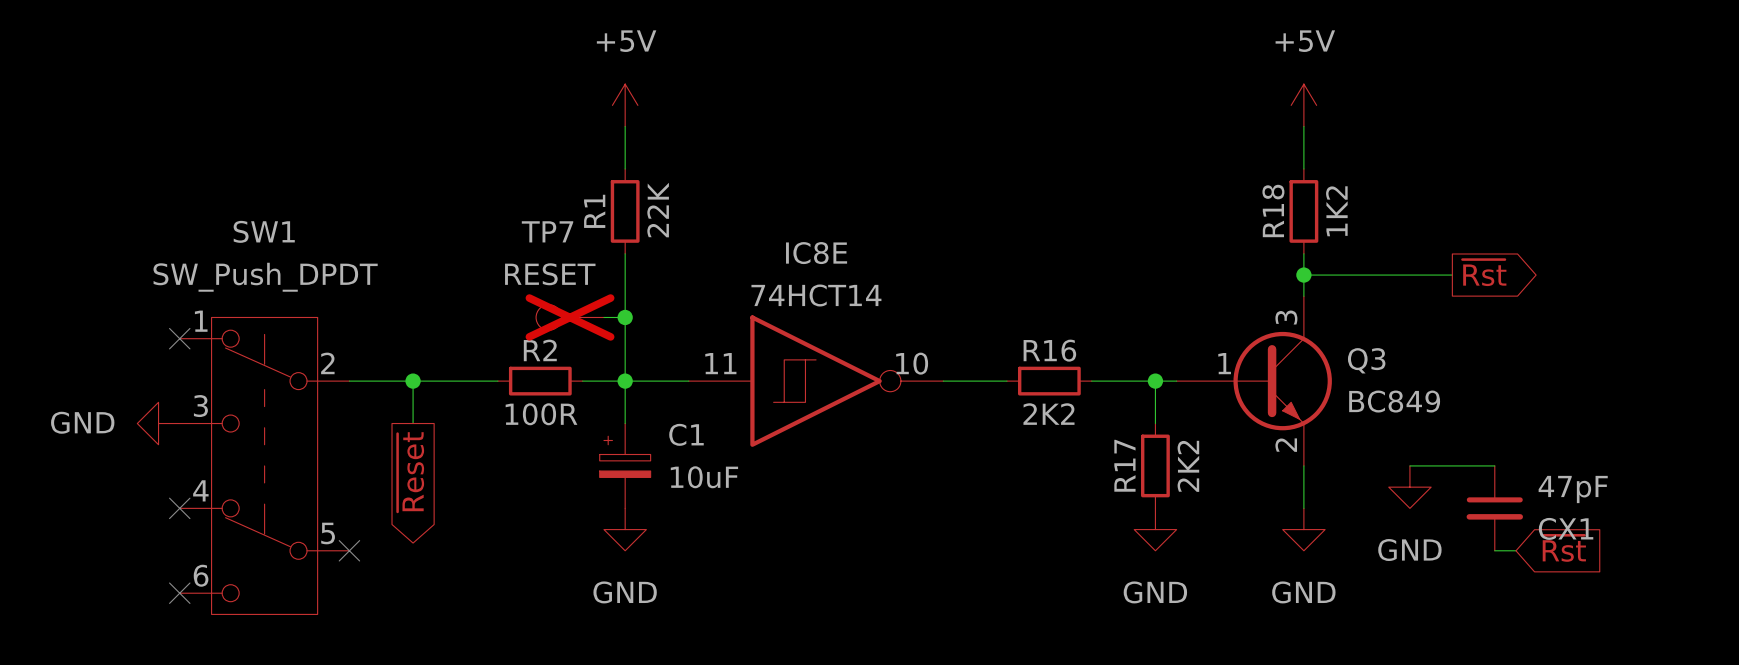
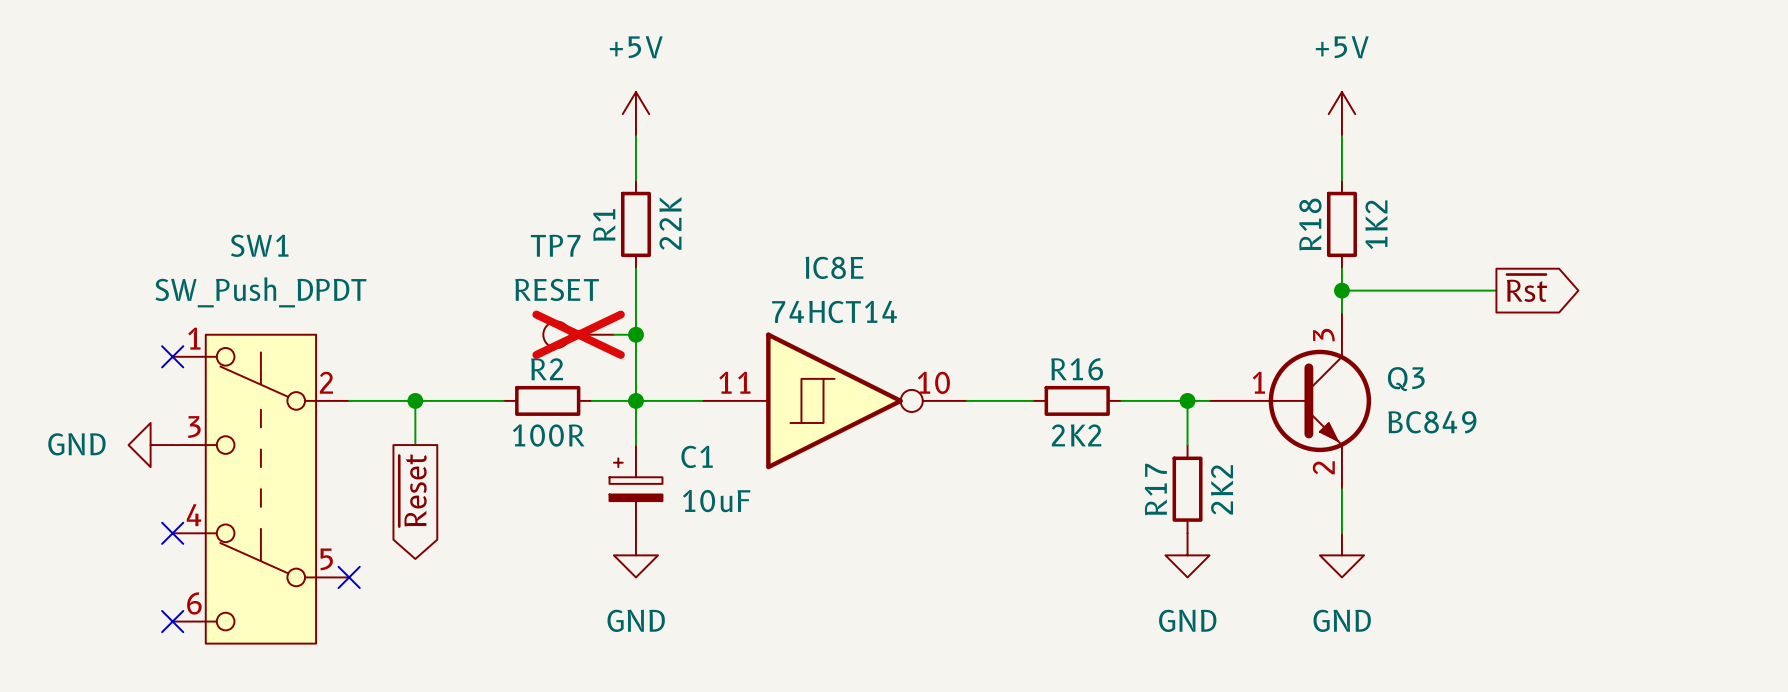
wire: (1409, 465) (1494, 465) -> none
power symbol: GND (1409, 487) -> none
CX1: 47pF (1494, 508) -> none
global label: ~{Rst} (1563, 548) -> none
wire: (1494, 550) (1516, 550) -> none

